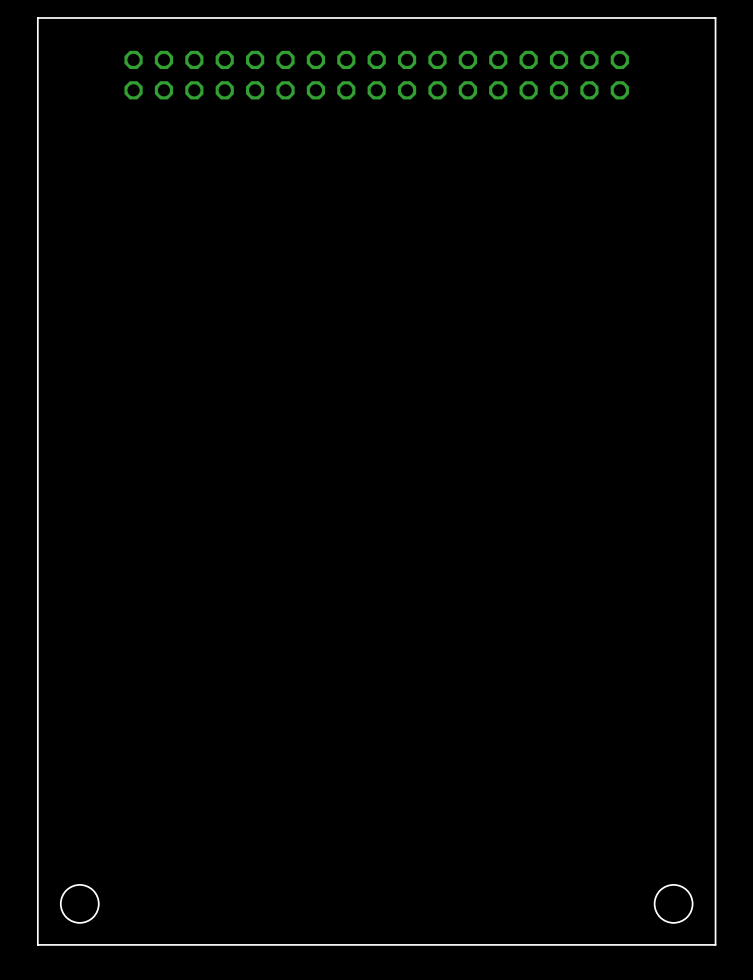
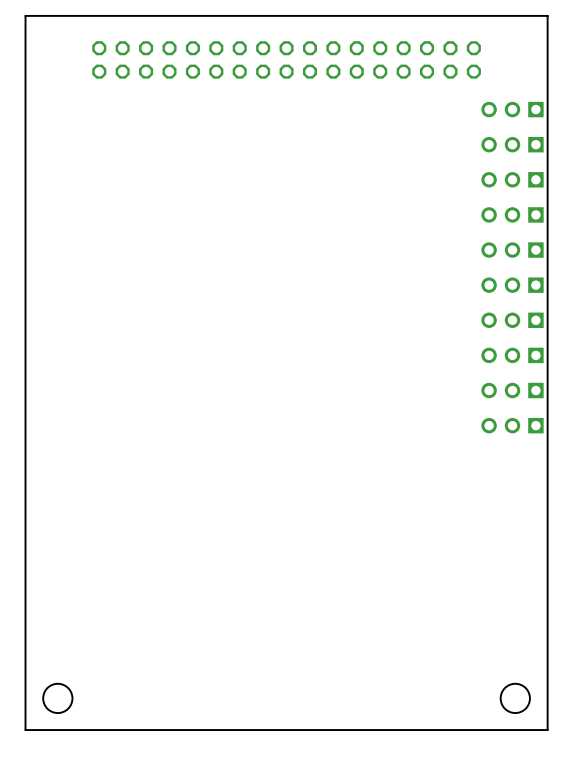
part: none -> (512, 109)
part: none -> (512, 144)
part: none -> (512, 179)
part: none -> (512, 214)
part: none -> (512, 250)
part: none -> (512, 285)
part: none -> (512, 320)
part: none -> (512, 355)
part: none -> (512, 390)
part: none -> (512, 425)

